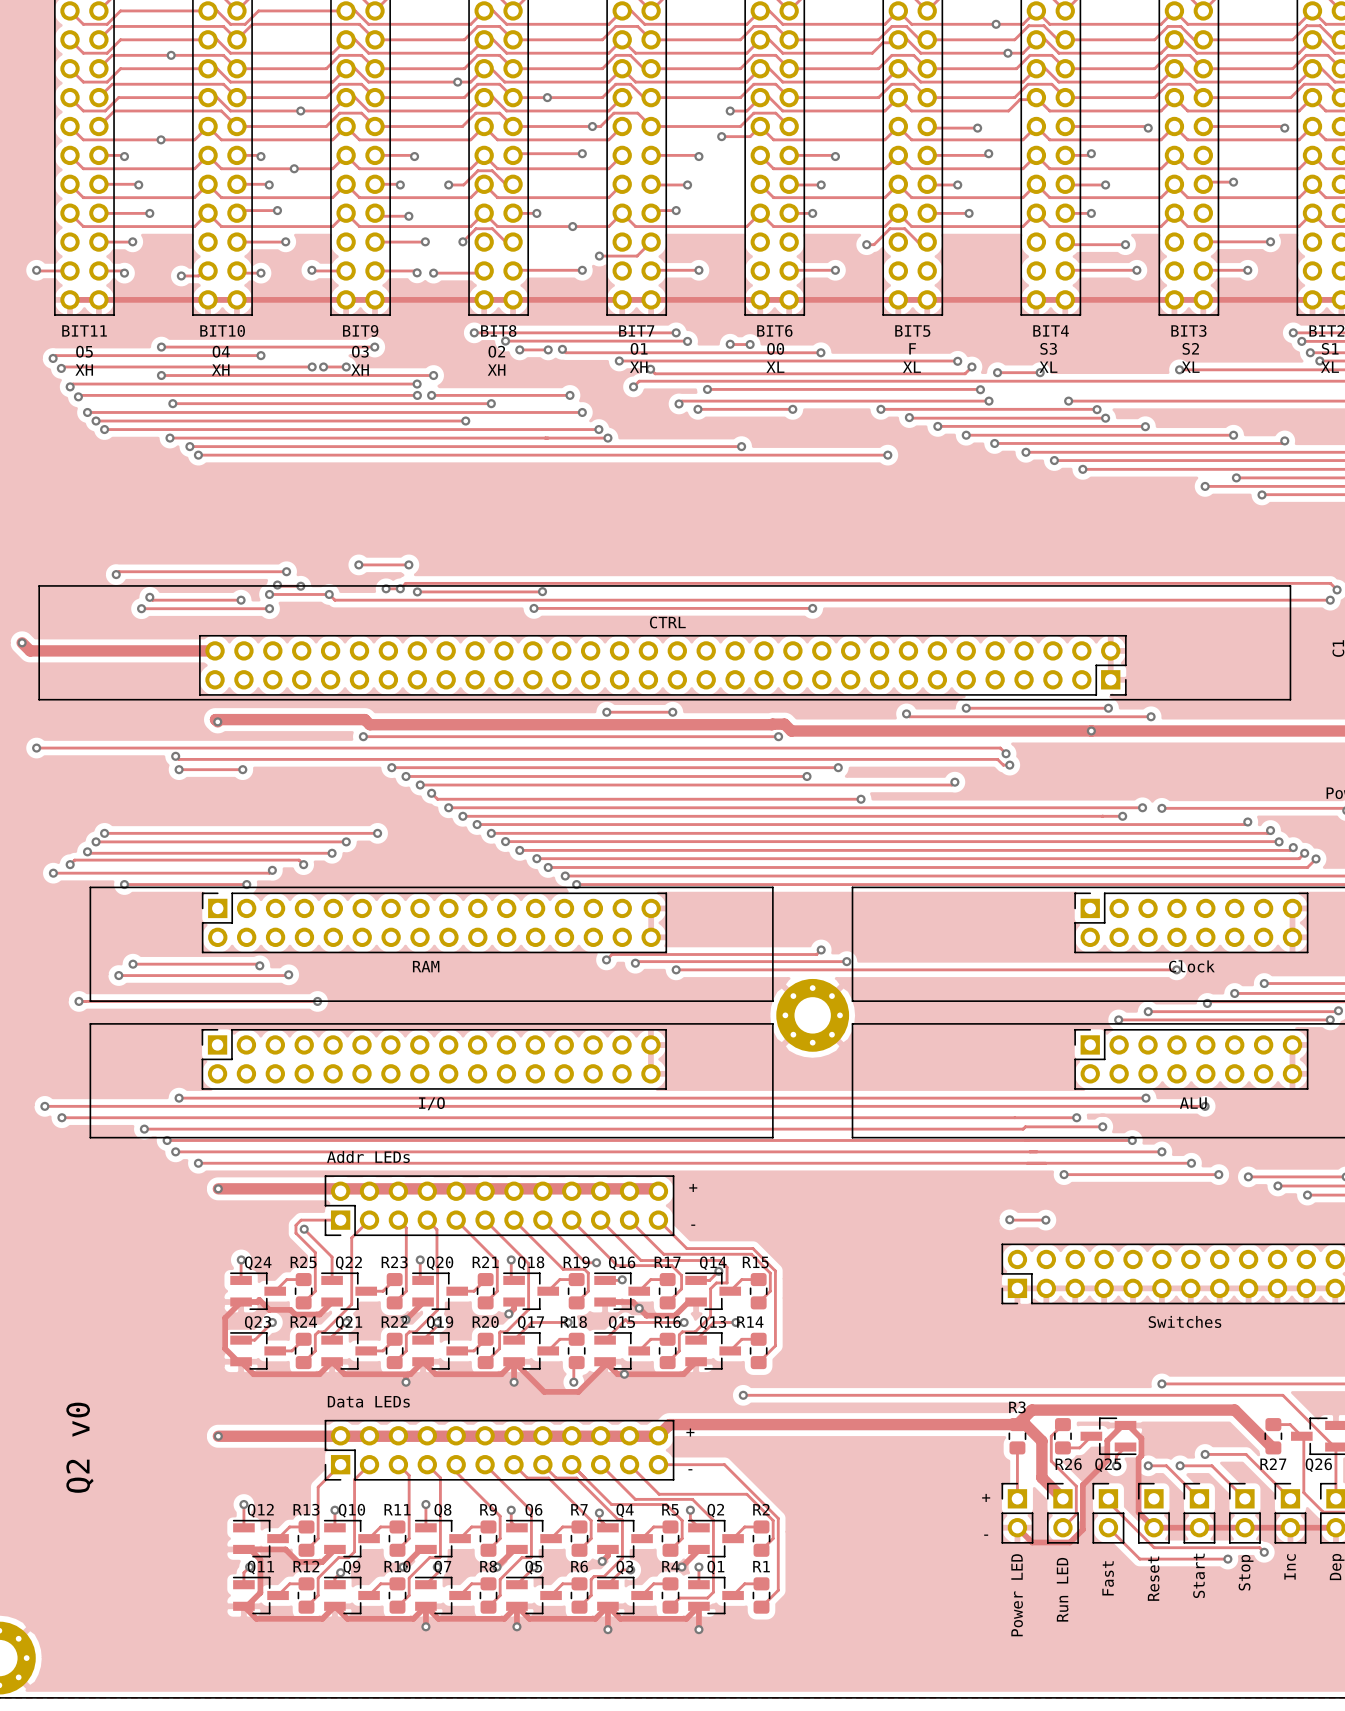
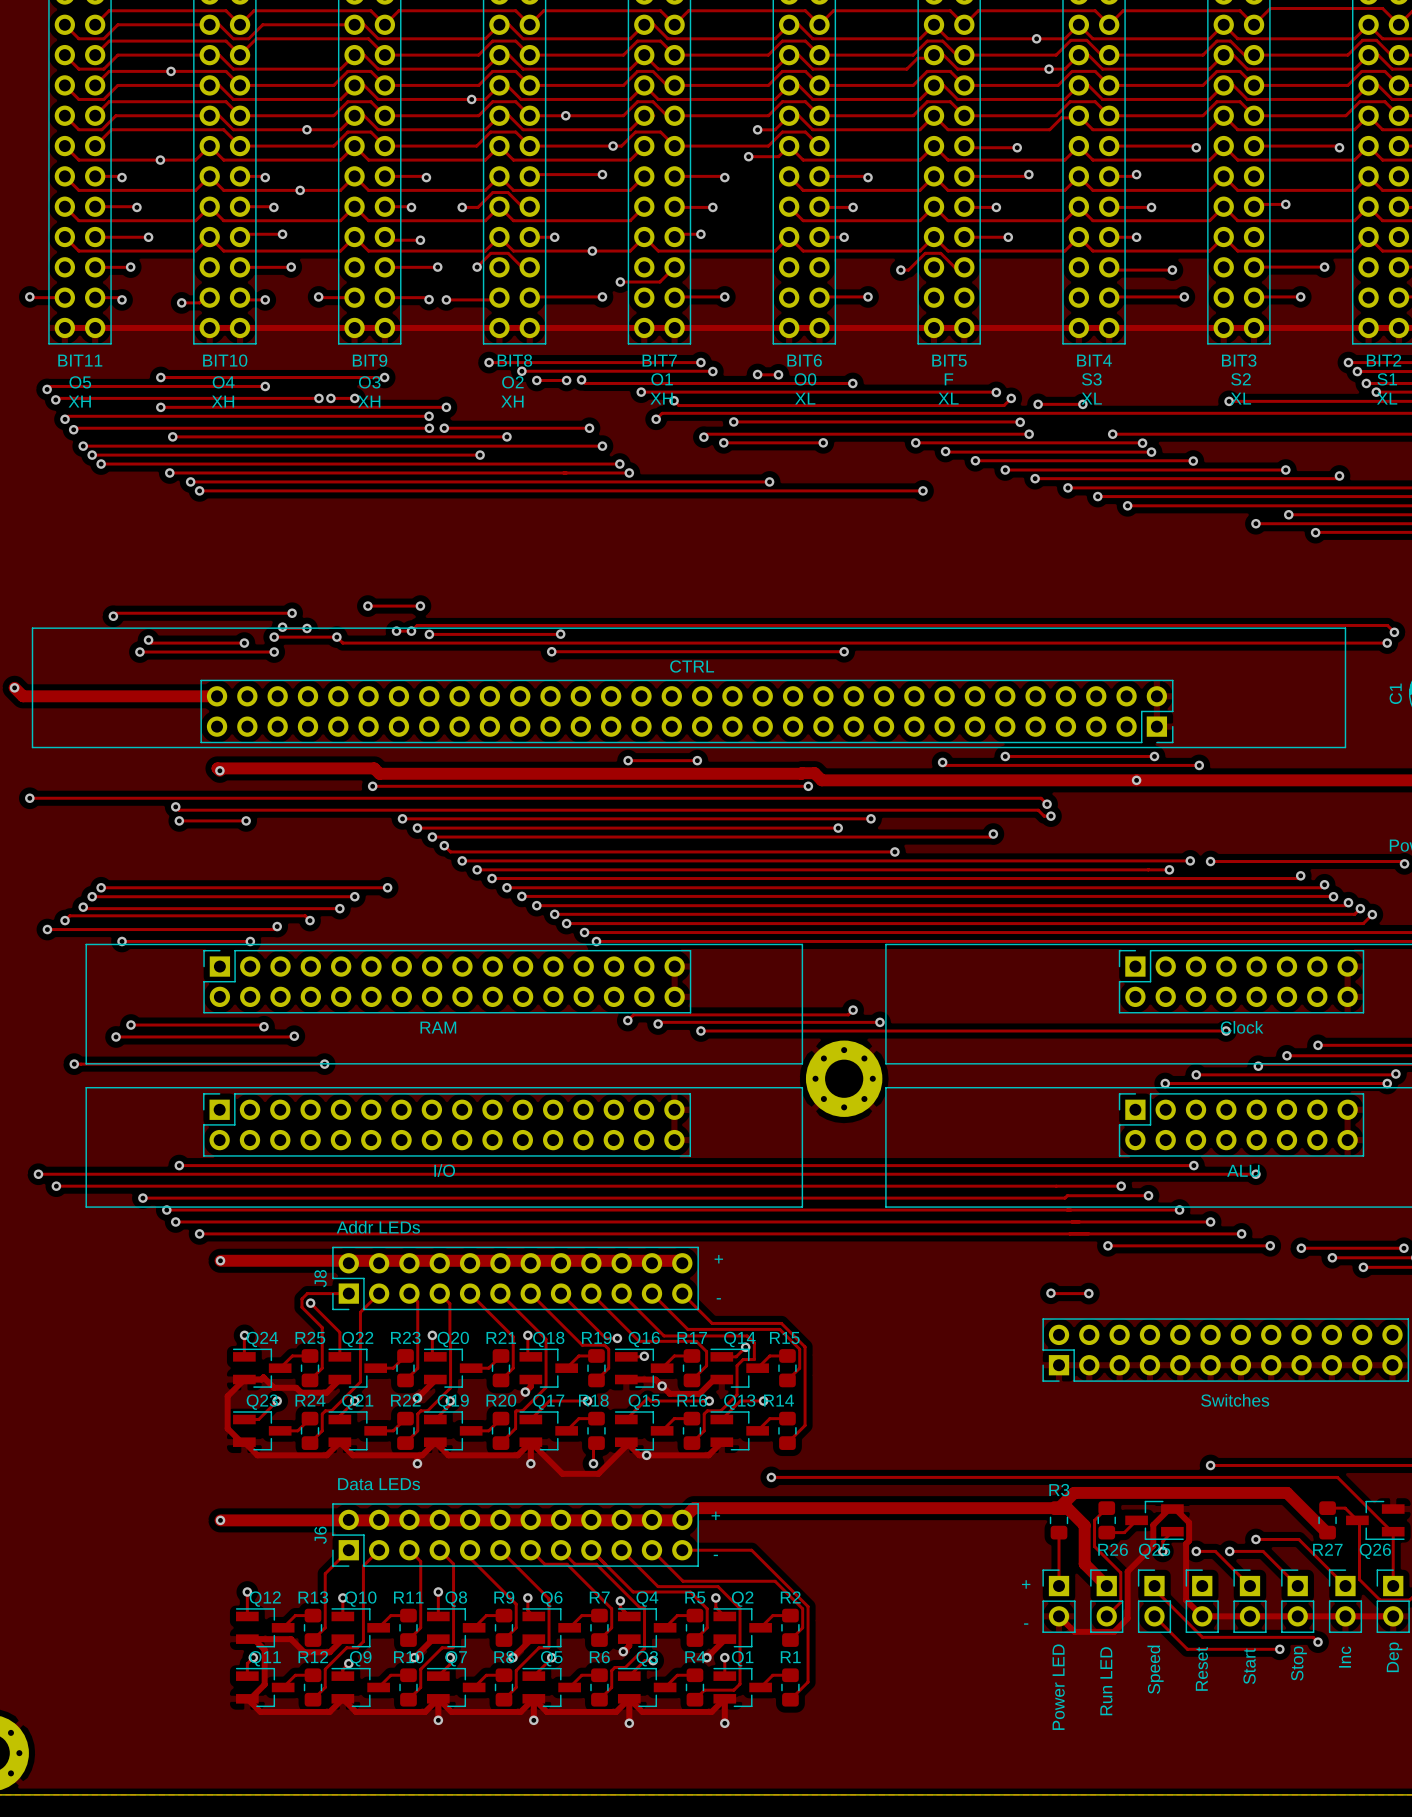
J8 name: none -> J8 (320, 1278)
text: Q2 v0 (79, 1447) -> none
J6 name: none -> J6 (320, 1535)
part value: Fast (1108, 1578) -> Speed (1155, 1669)

